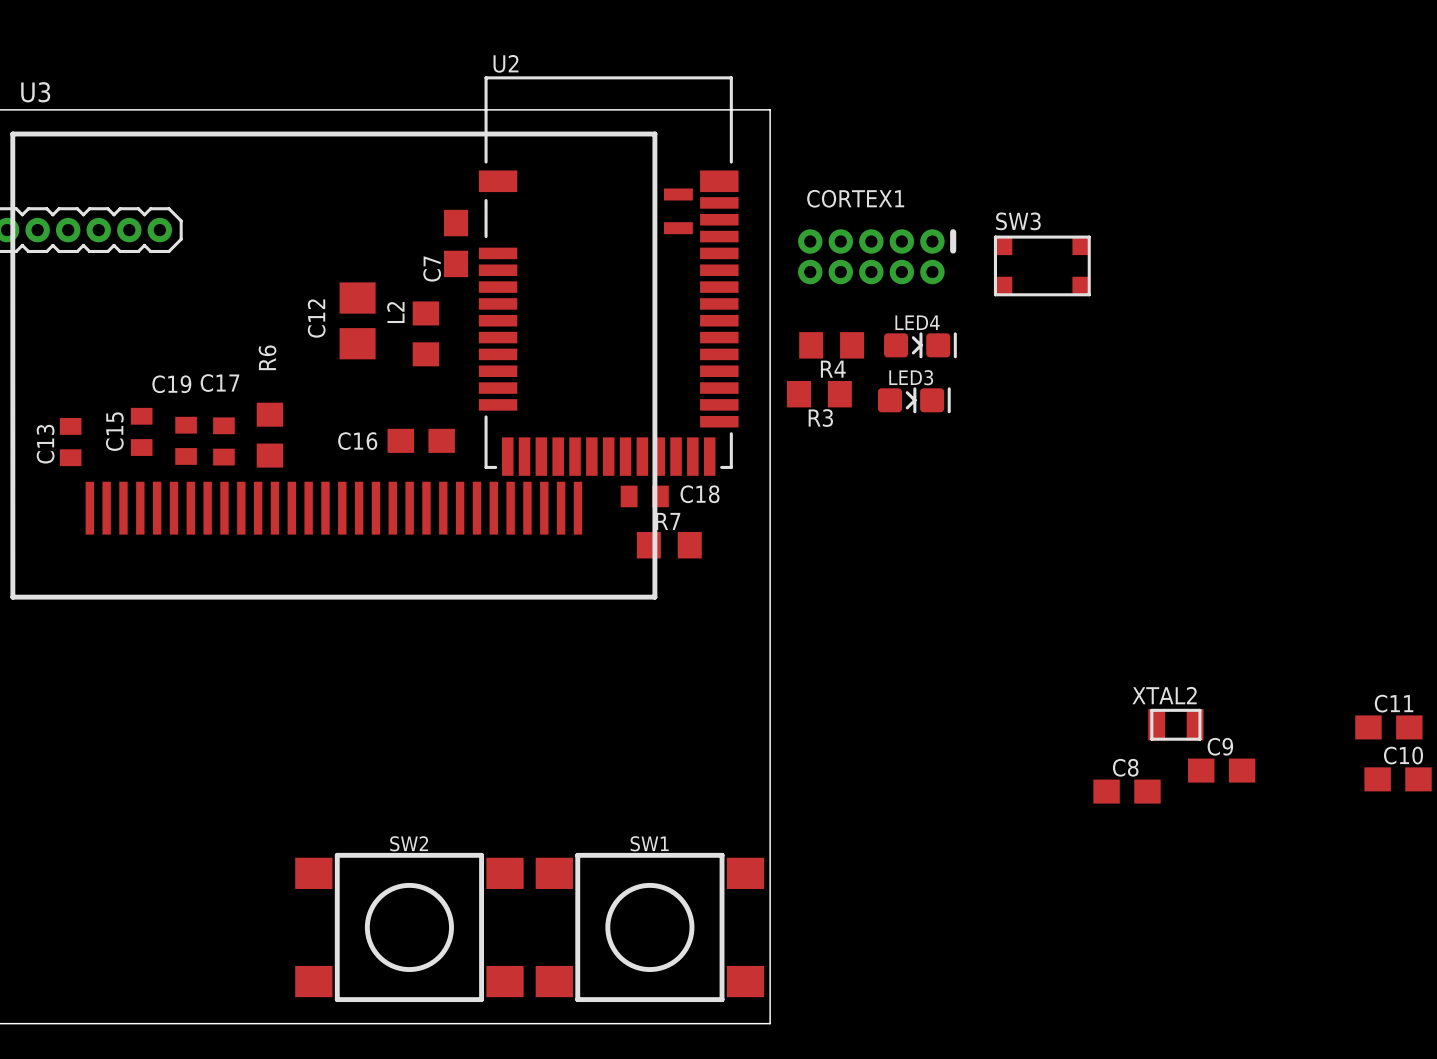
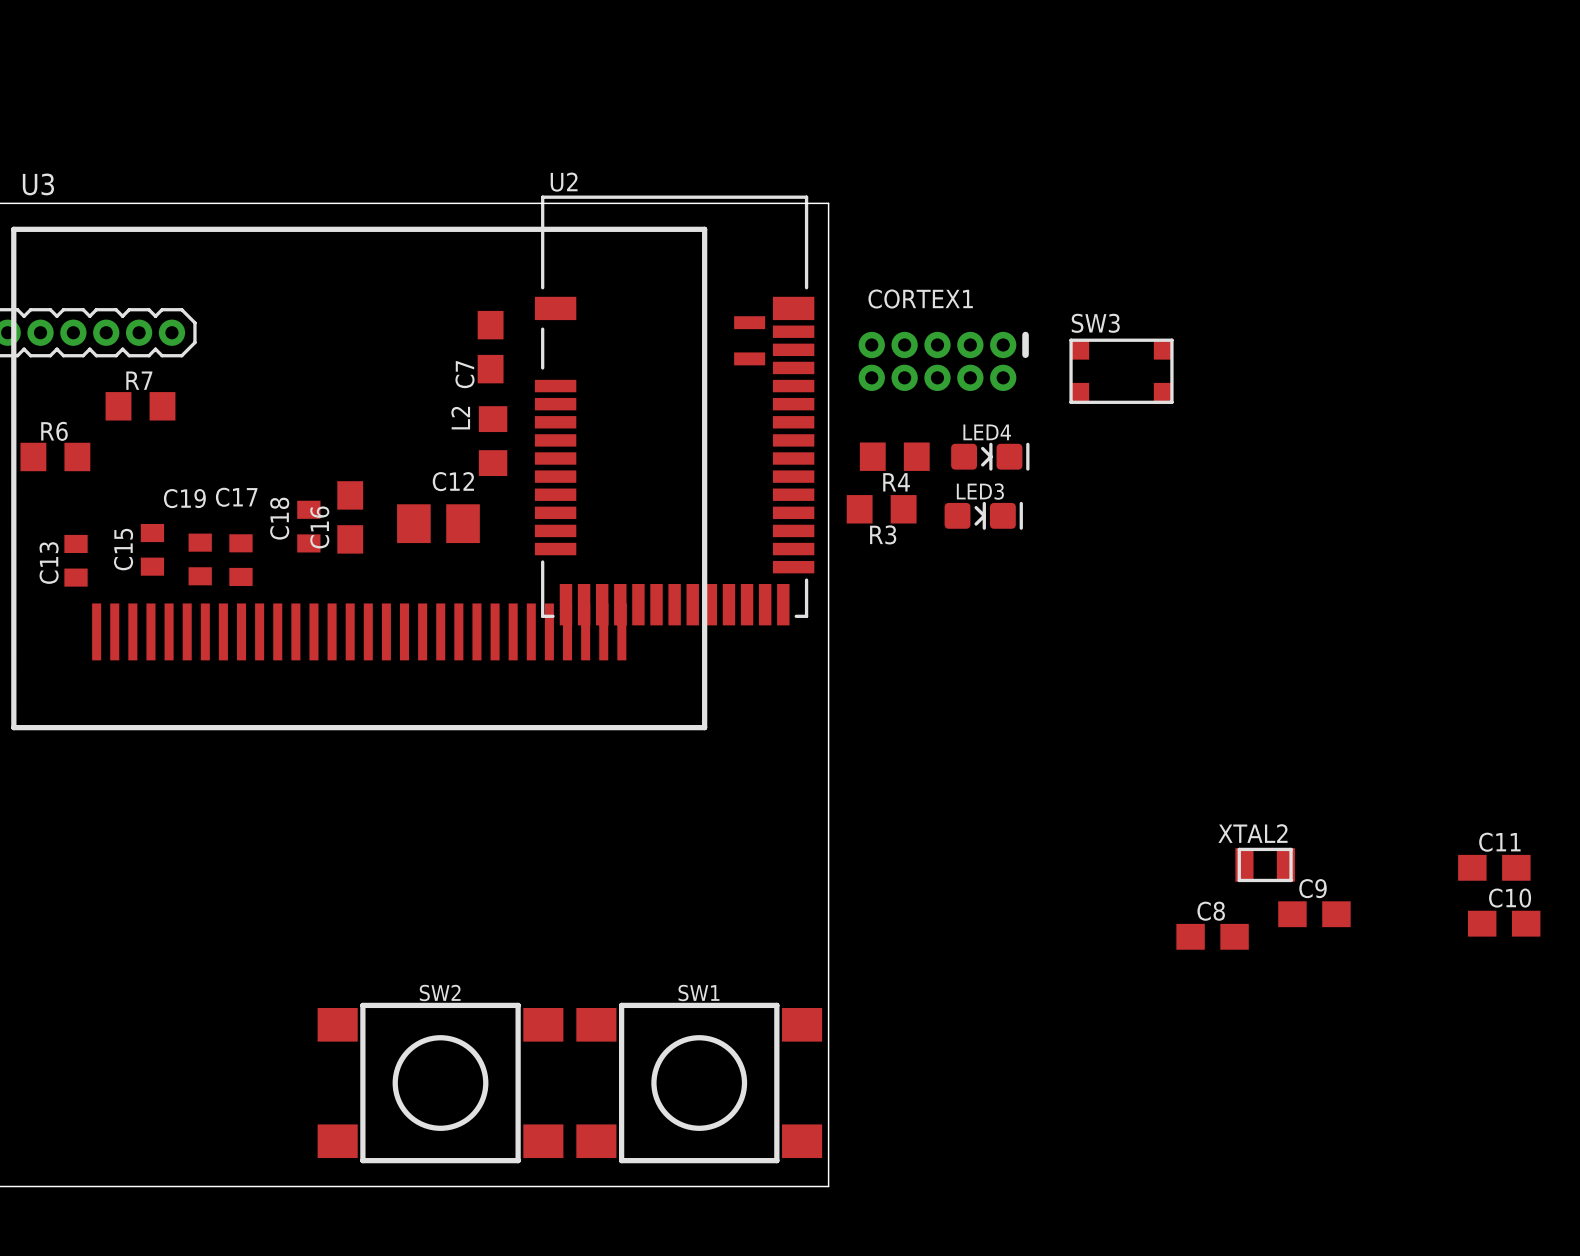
U2 position: (608, 276) -> (674, 410)
C12 rotation: 0° (357, 320) -> 90° clockwise (438, 523)
C12 position: (357, 320) -> (438, 523)
L2 position: (425, 333) -> (493, 441)
R6 name position: R6 (267, 357) -> R6 (54, 431)
R6 rotation: 0° (269, 435) -> 90° clockwise (55, 456)
R6 position: (269, 435) -> (55, 456)
C16 rotation: 0° (421, 440) -> 90° clockwise (350, 517)
C16 position: (421, 440) -> (350, 517)
C18 name position: C18 (700, 494) -> C18 (279, 518)
C18 rotation: 0° (644, 496) -> 90° clockwise (308, 526)
C18 position: (644, 496) -> (308, 526)
R7 position: (669, 545) -> (140, 406)

